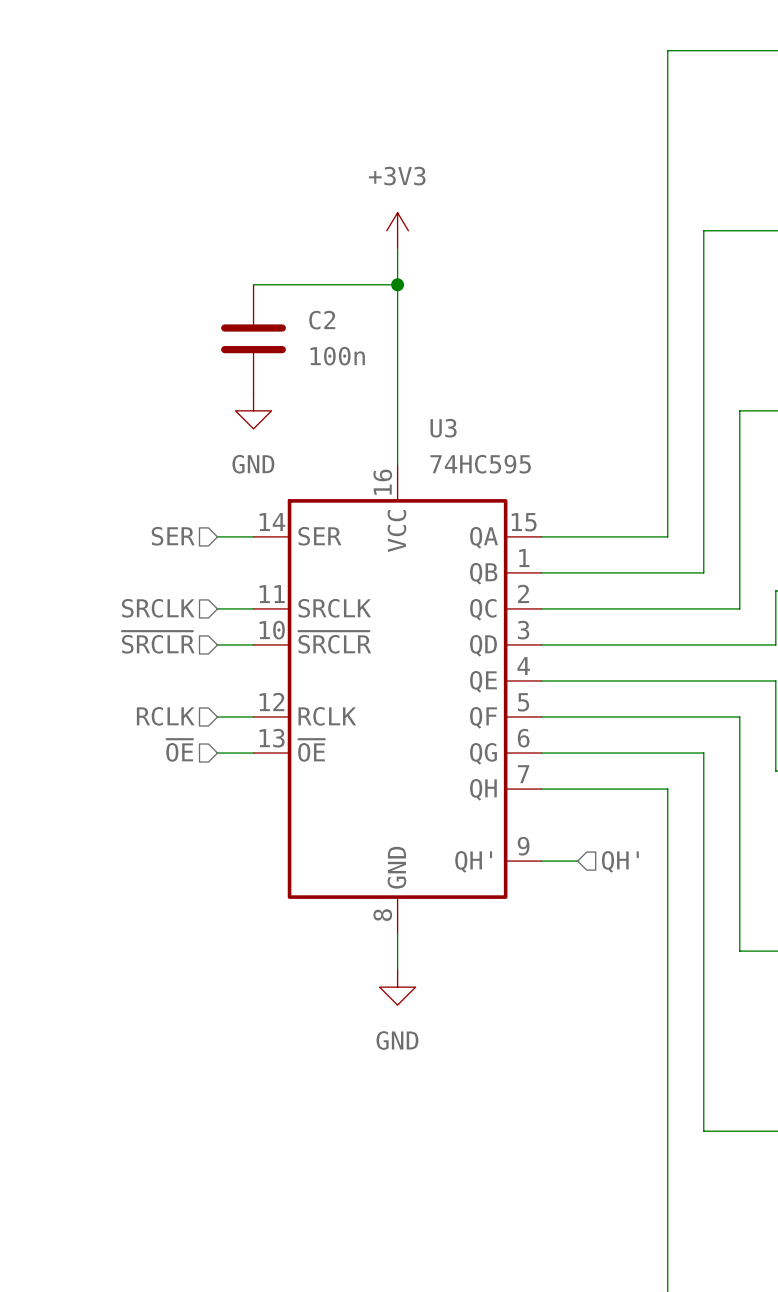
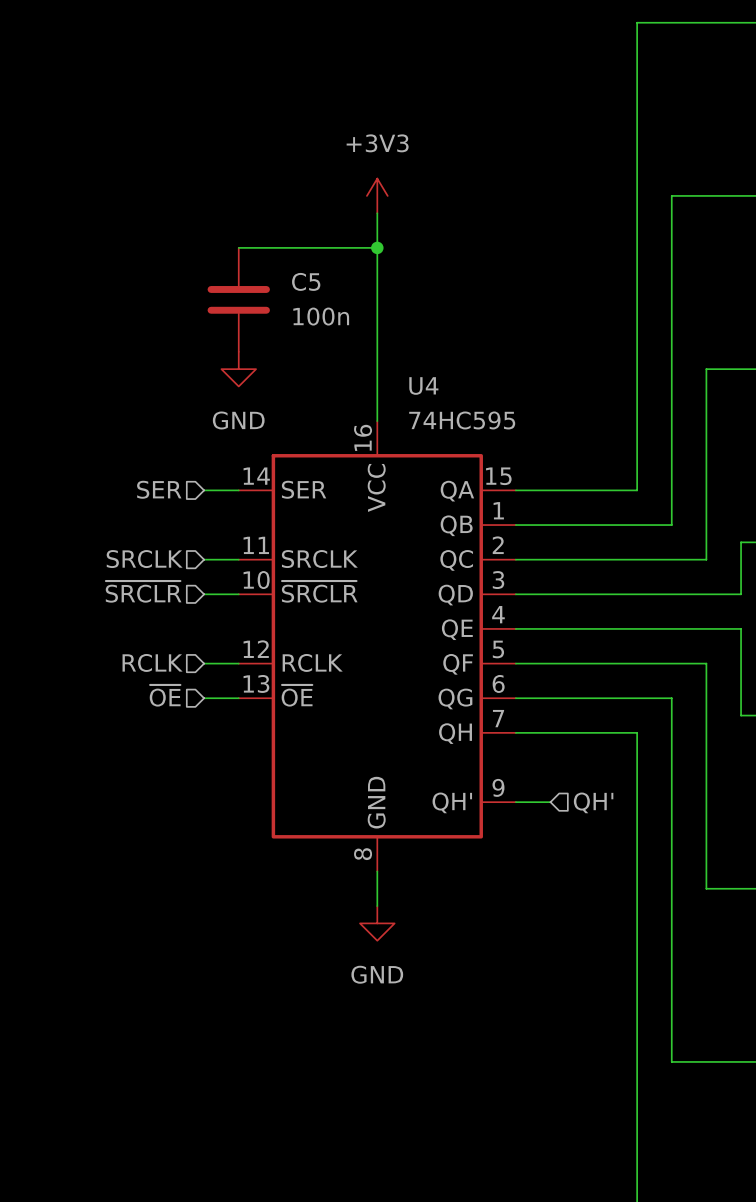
C2 name: C2 (322, 320) -> C5 (306, 281)
U3 name: U3 (443, 428) -> U4 (423, 385)

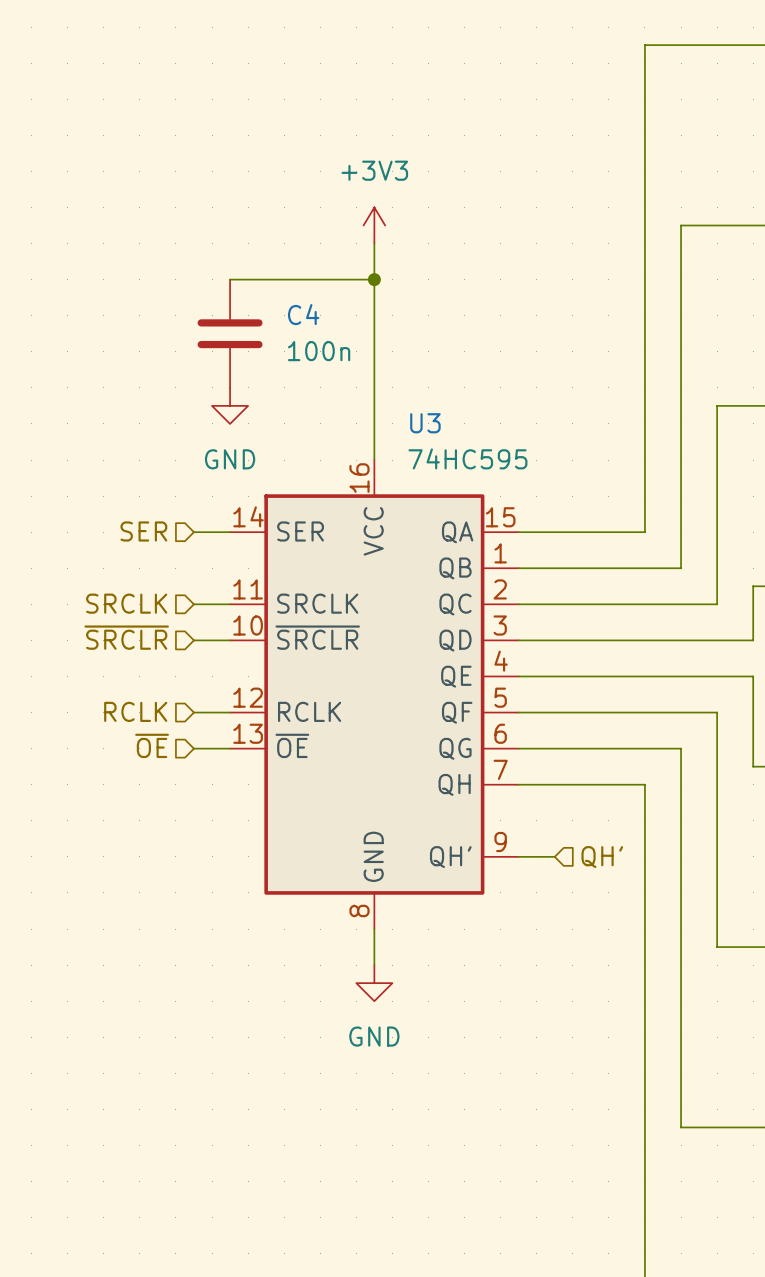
C5 name: C5 (306, 281) -> C4 (303, 314)
U4 name: U4 (423, 385) -> U3 (425, 423)

